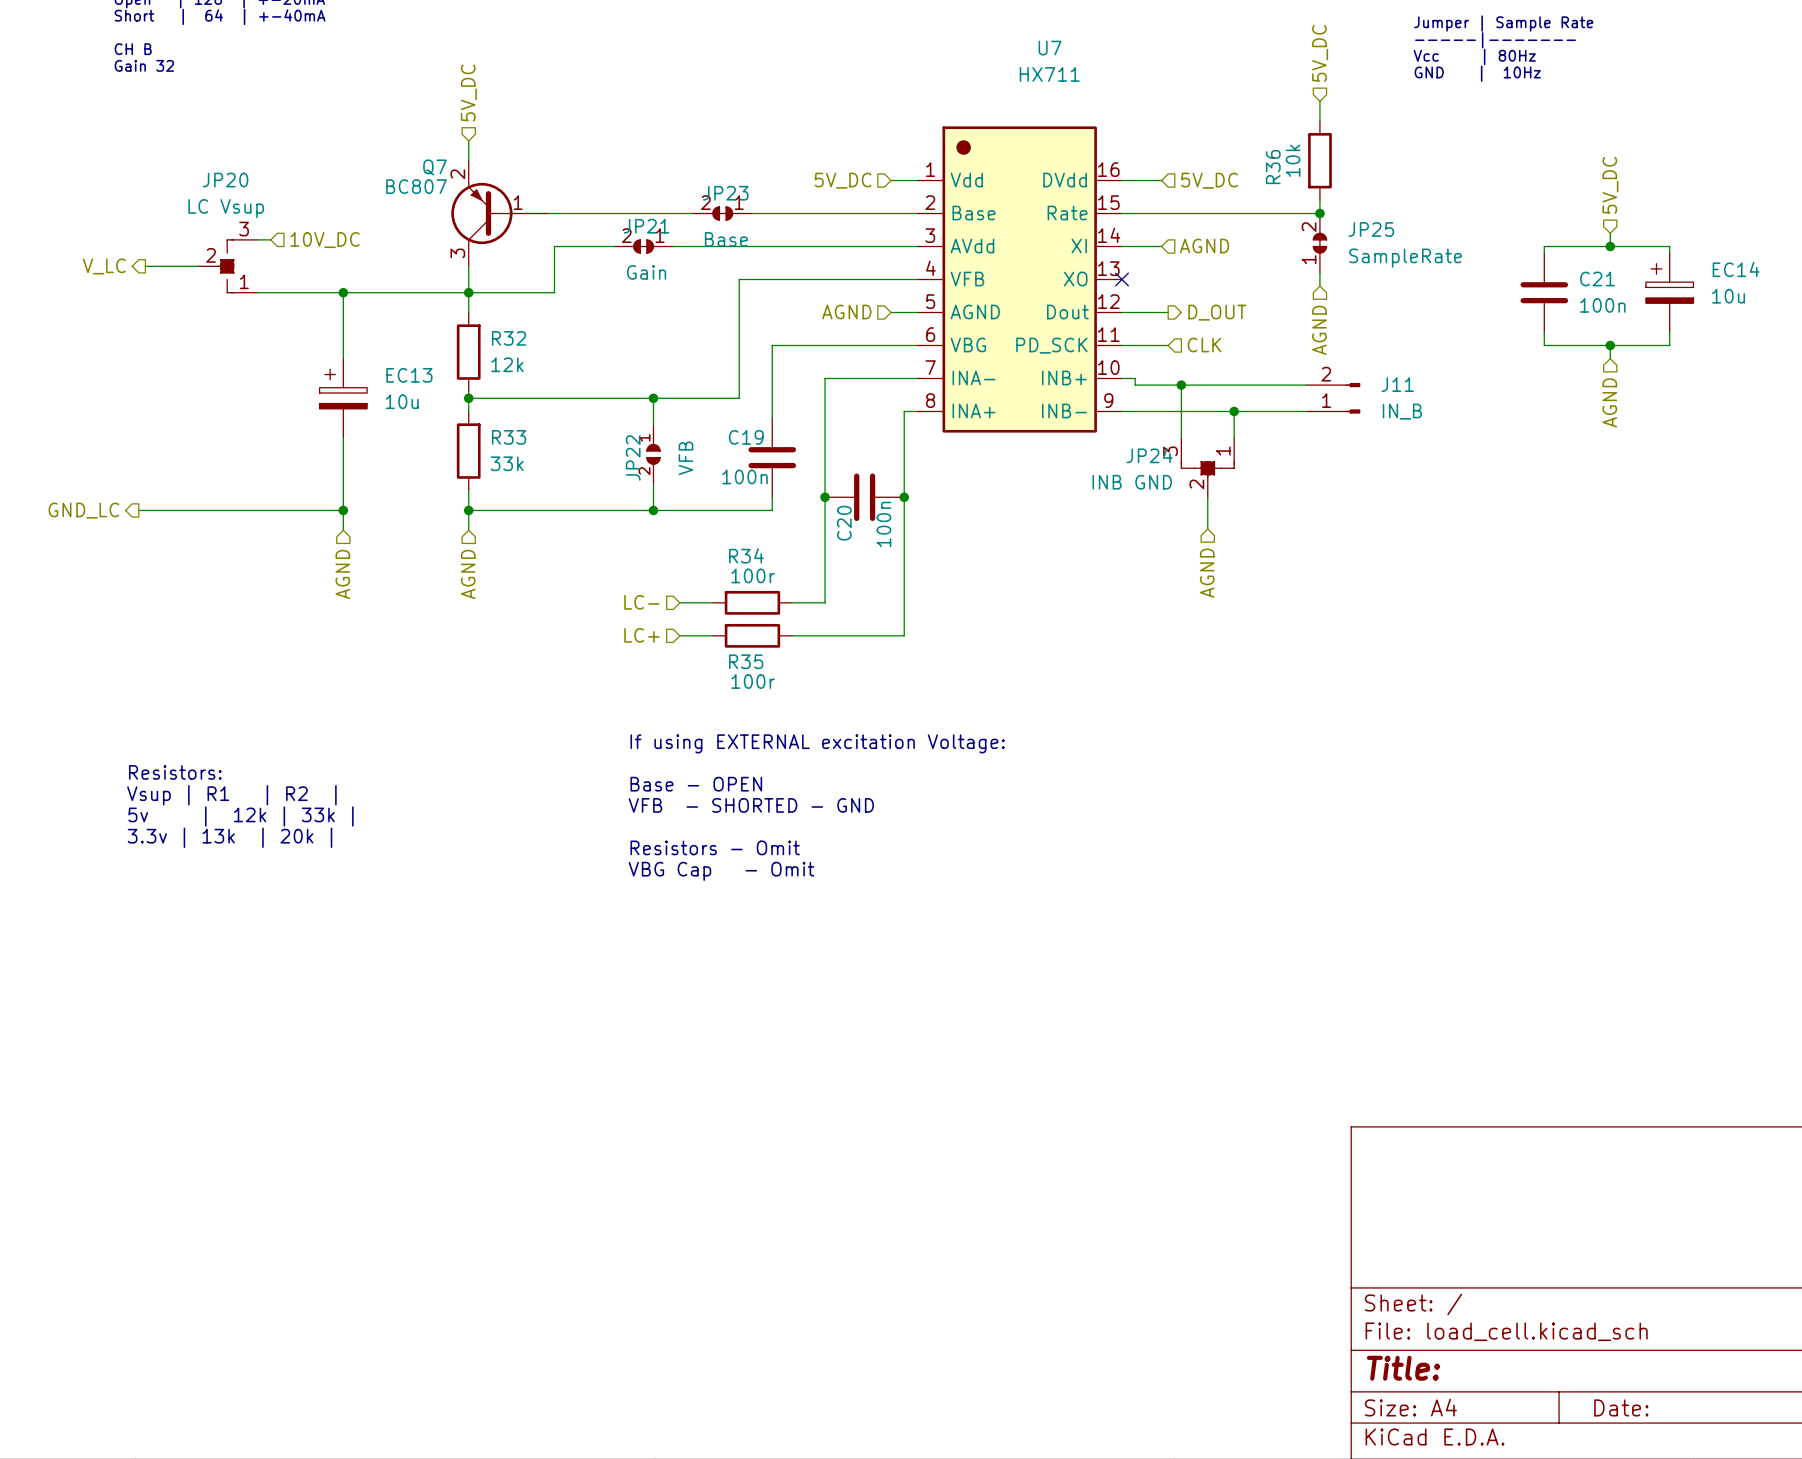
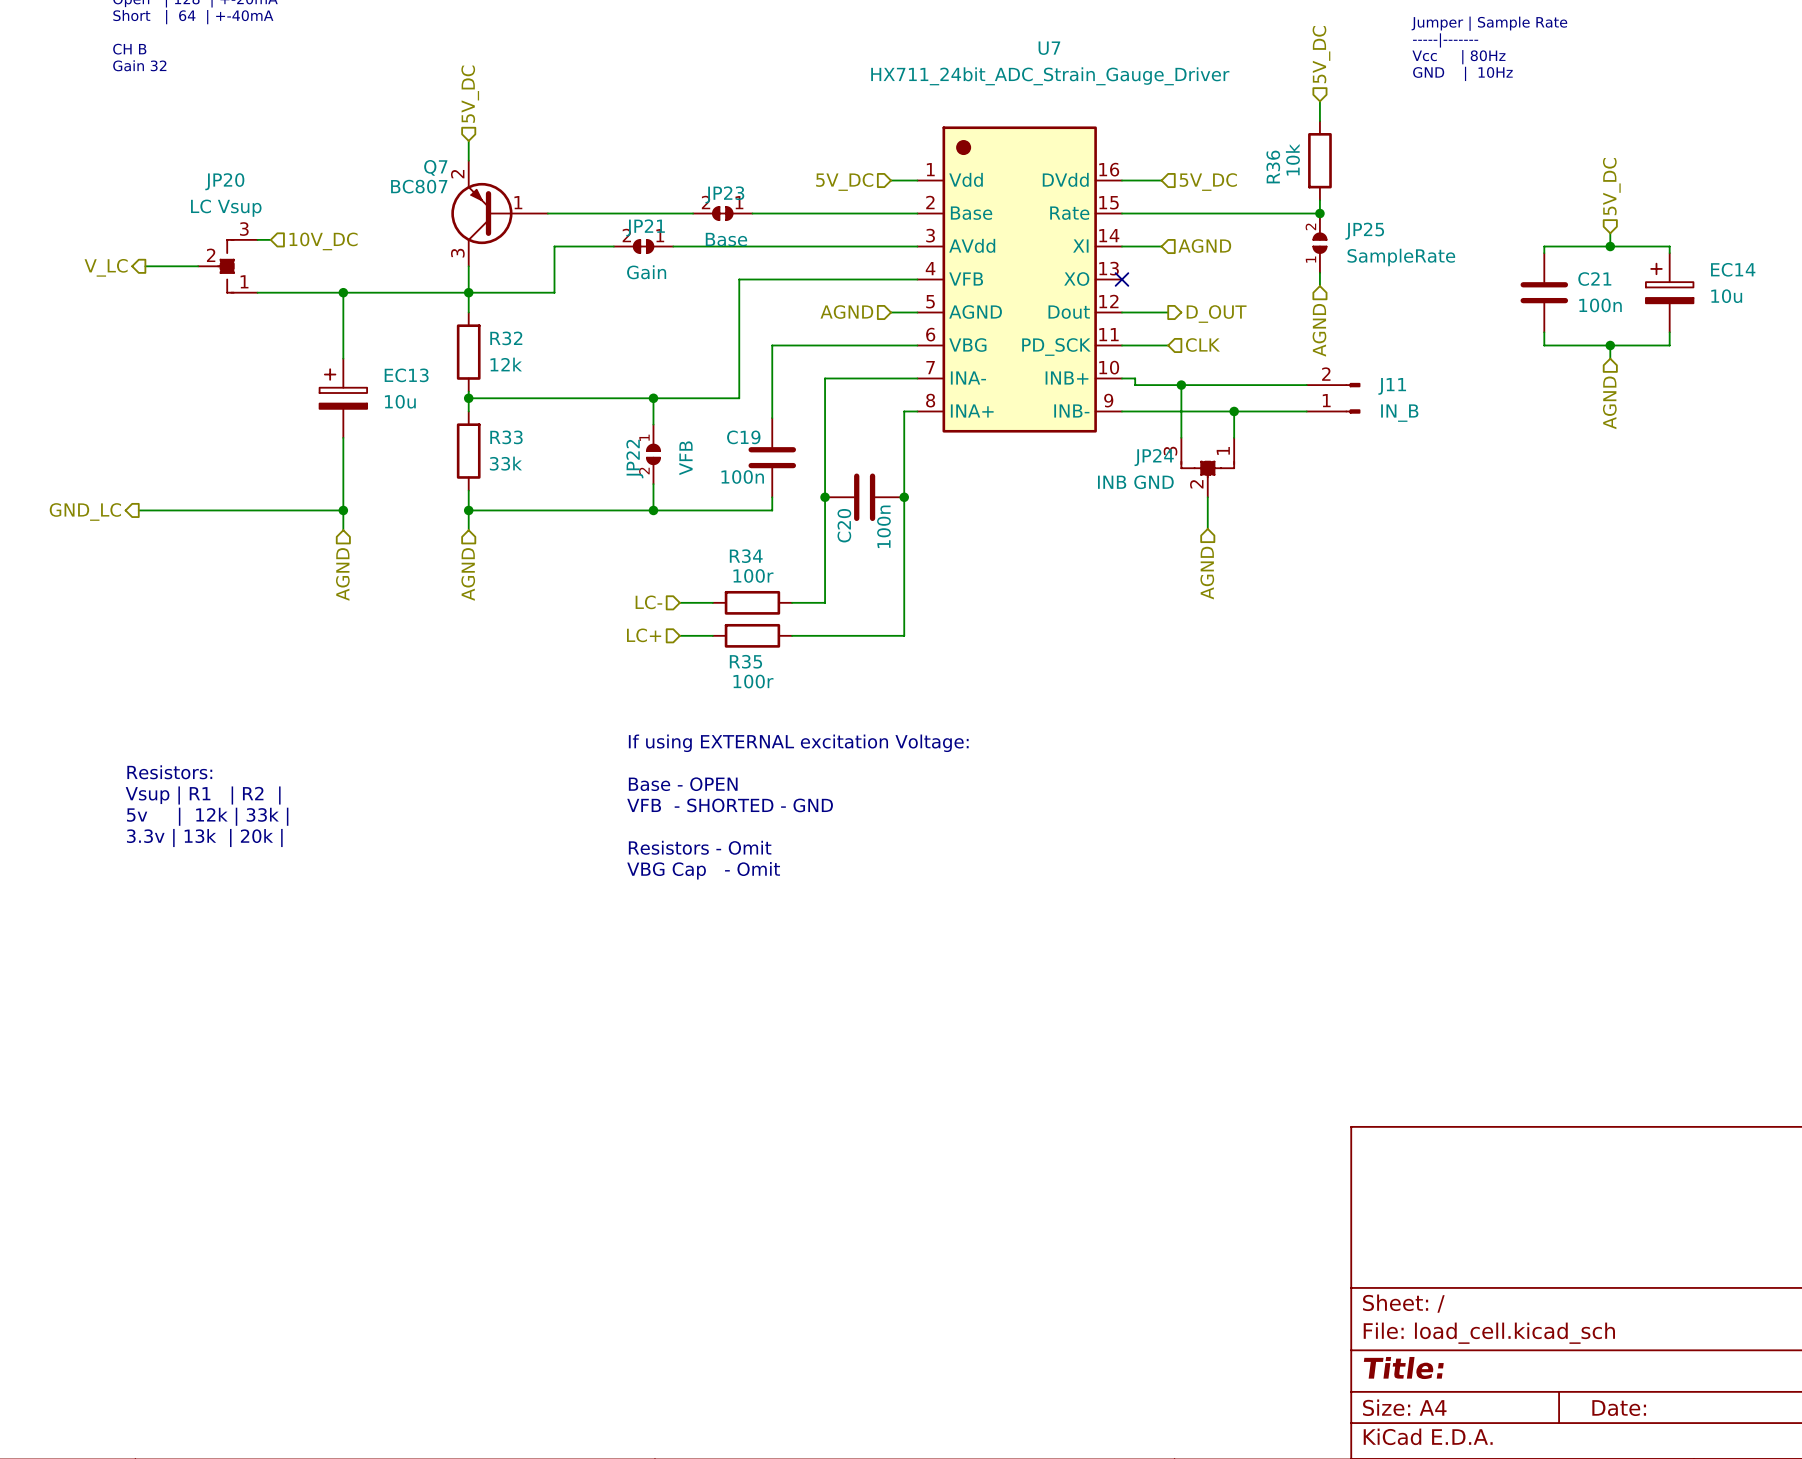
U7 value: HX711 (1049, 74) -> HX711_24bit_ADC_Strain_Gauge_Driver (1050, 76)
JP25 symbol: [1313, 213, 1327, 273] -> [1313, 213, 1327, 273]

